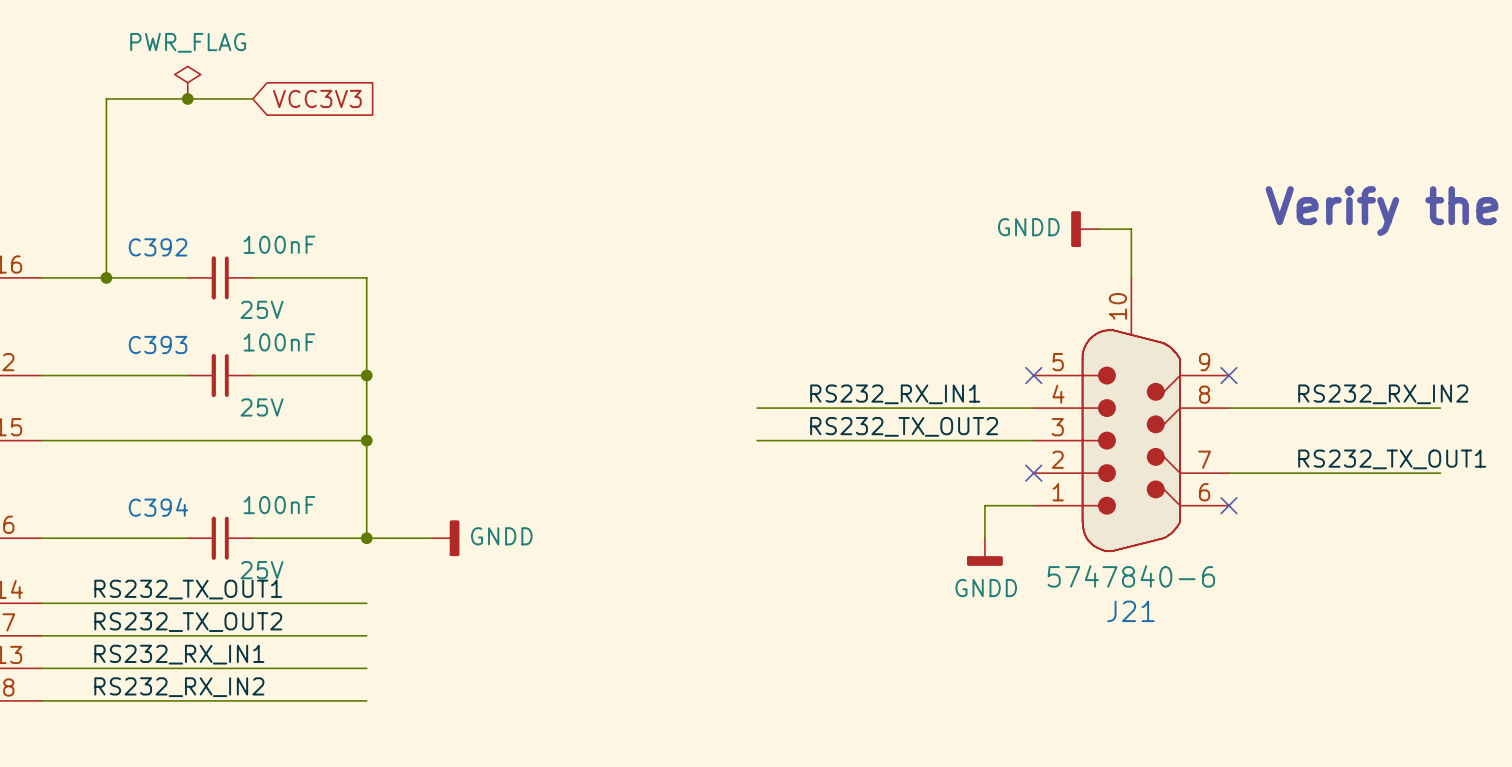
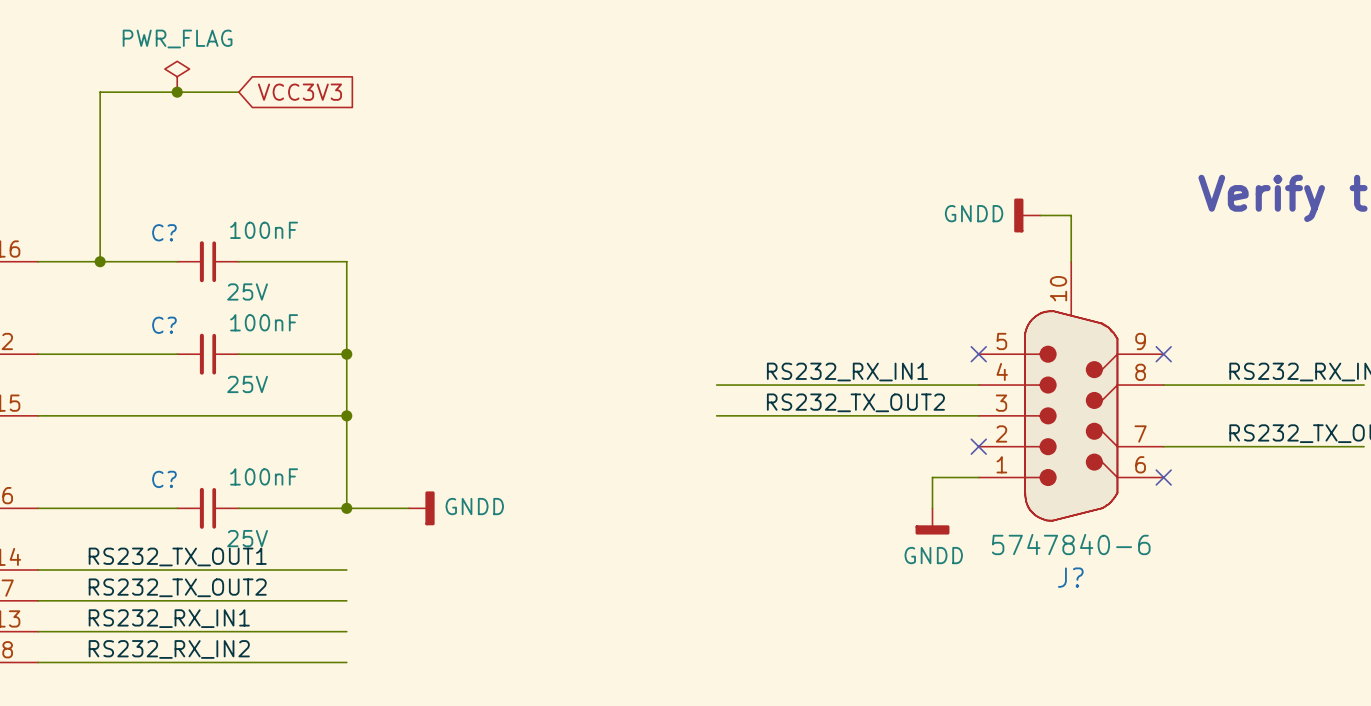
C392 name: C392 (158, 247) -> C? (164, 232)
C393 name: C393 (158, 344) -> C? (164, 325)
C394 name: C394 (158, 507) -> C? (164, 479)
J21 name: J21 (1130, 611) -> J? (1070, 577)

